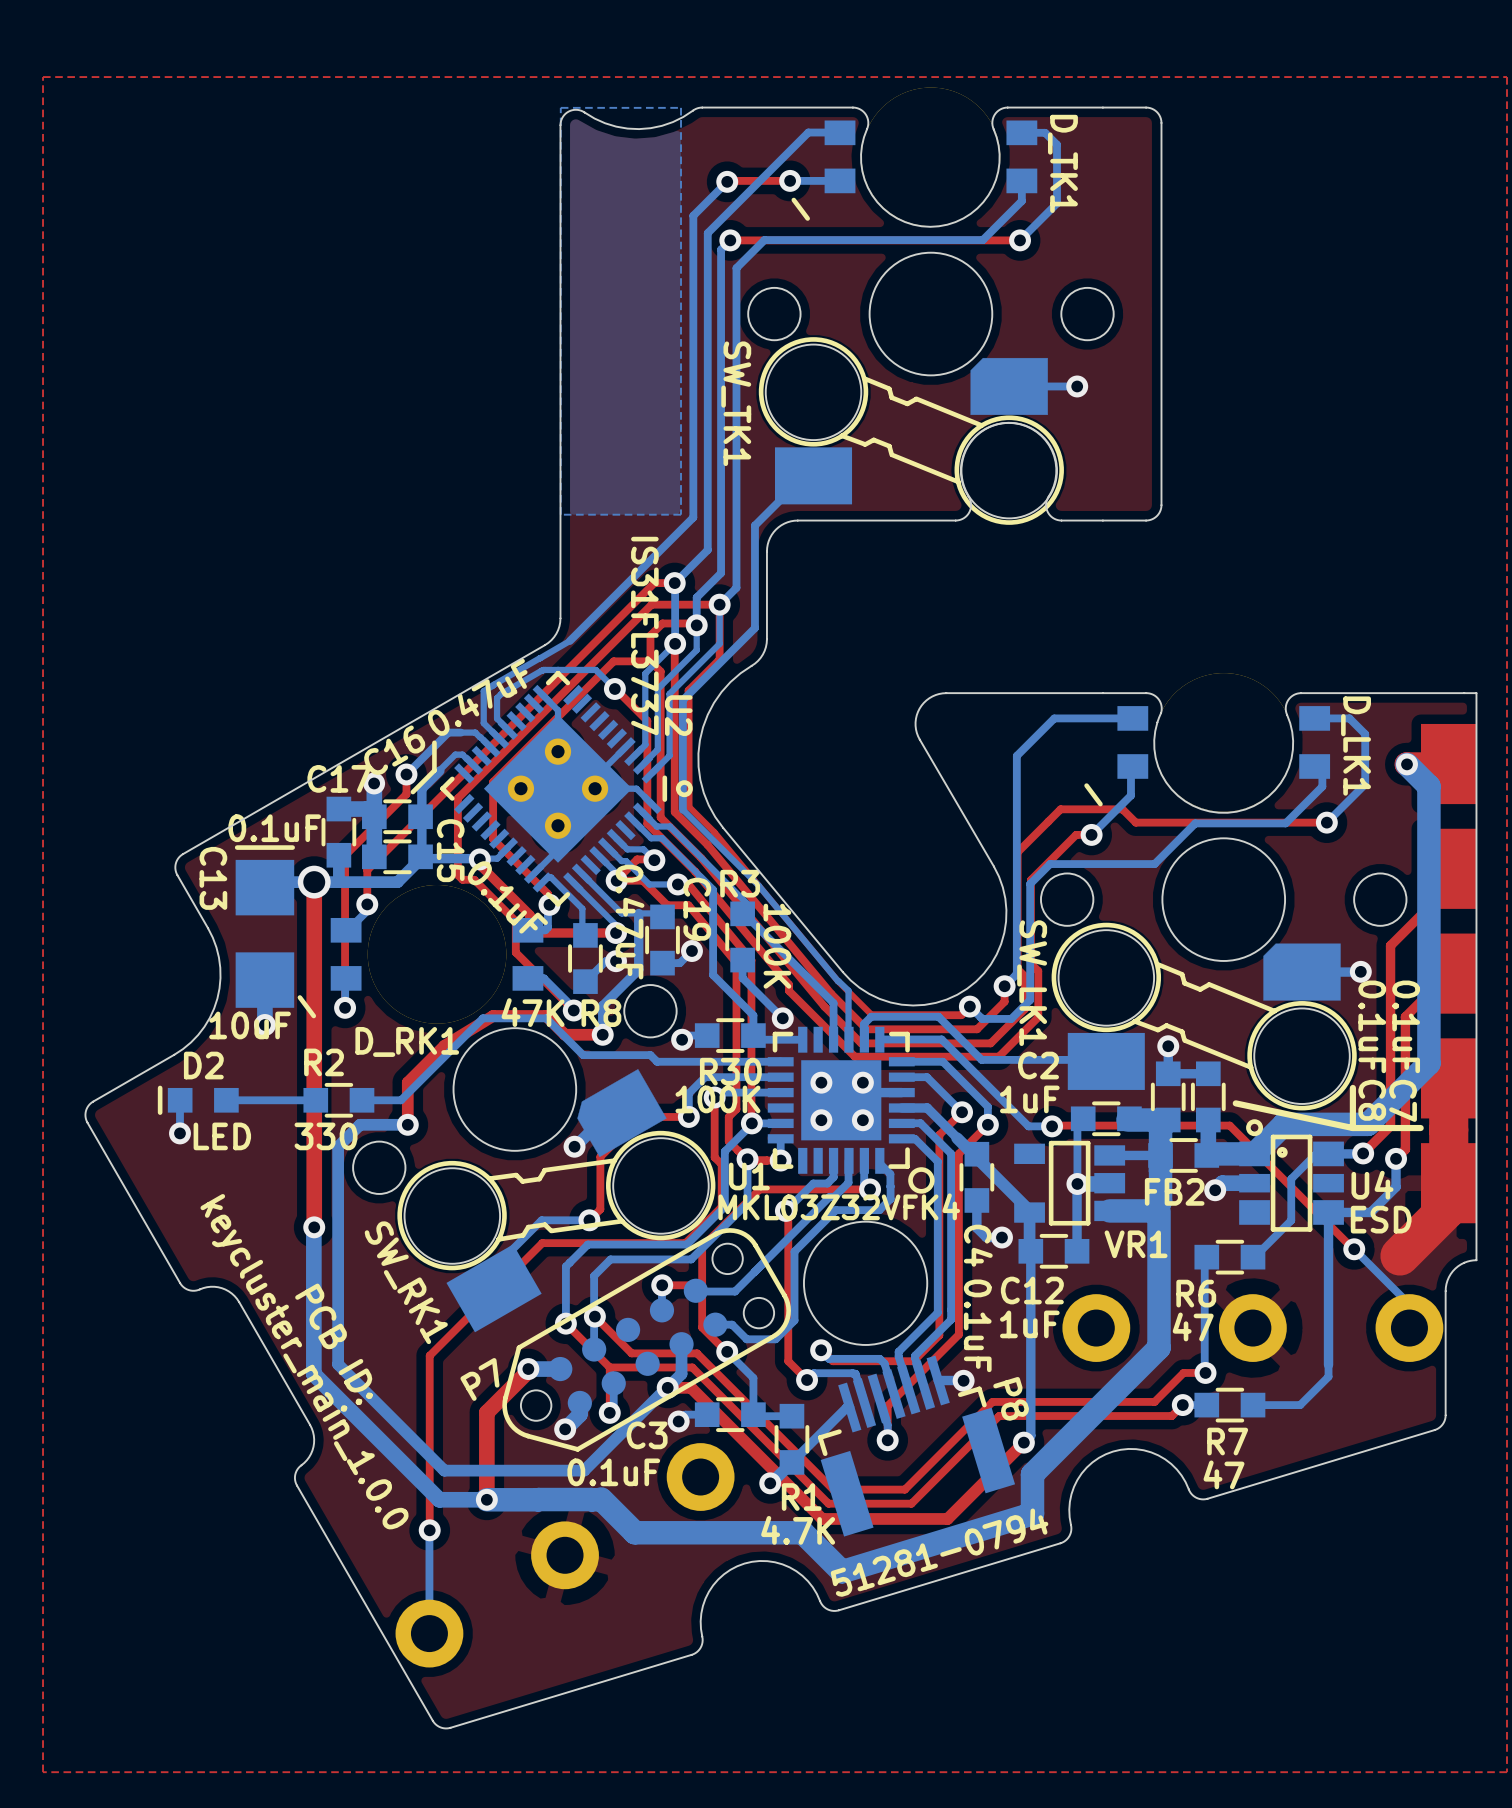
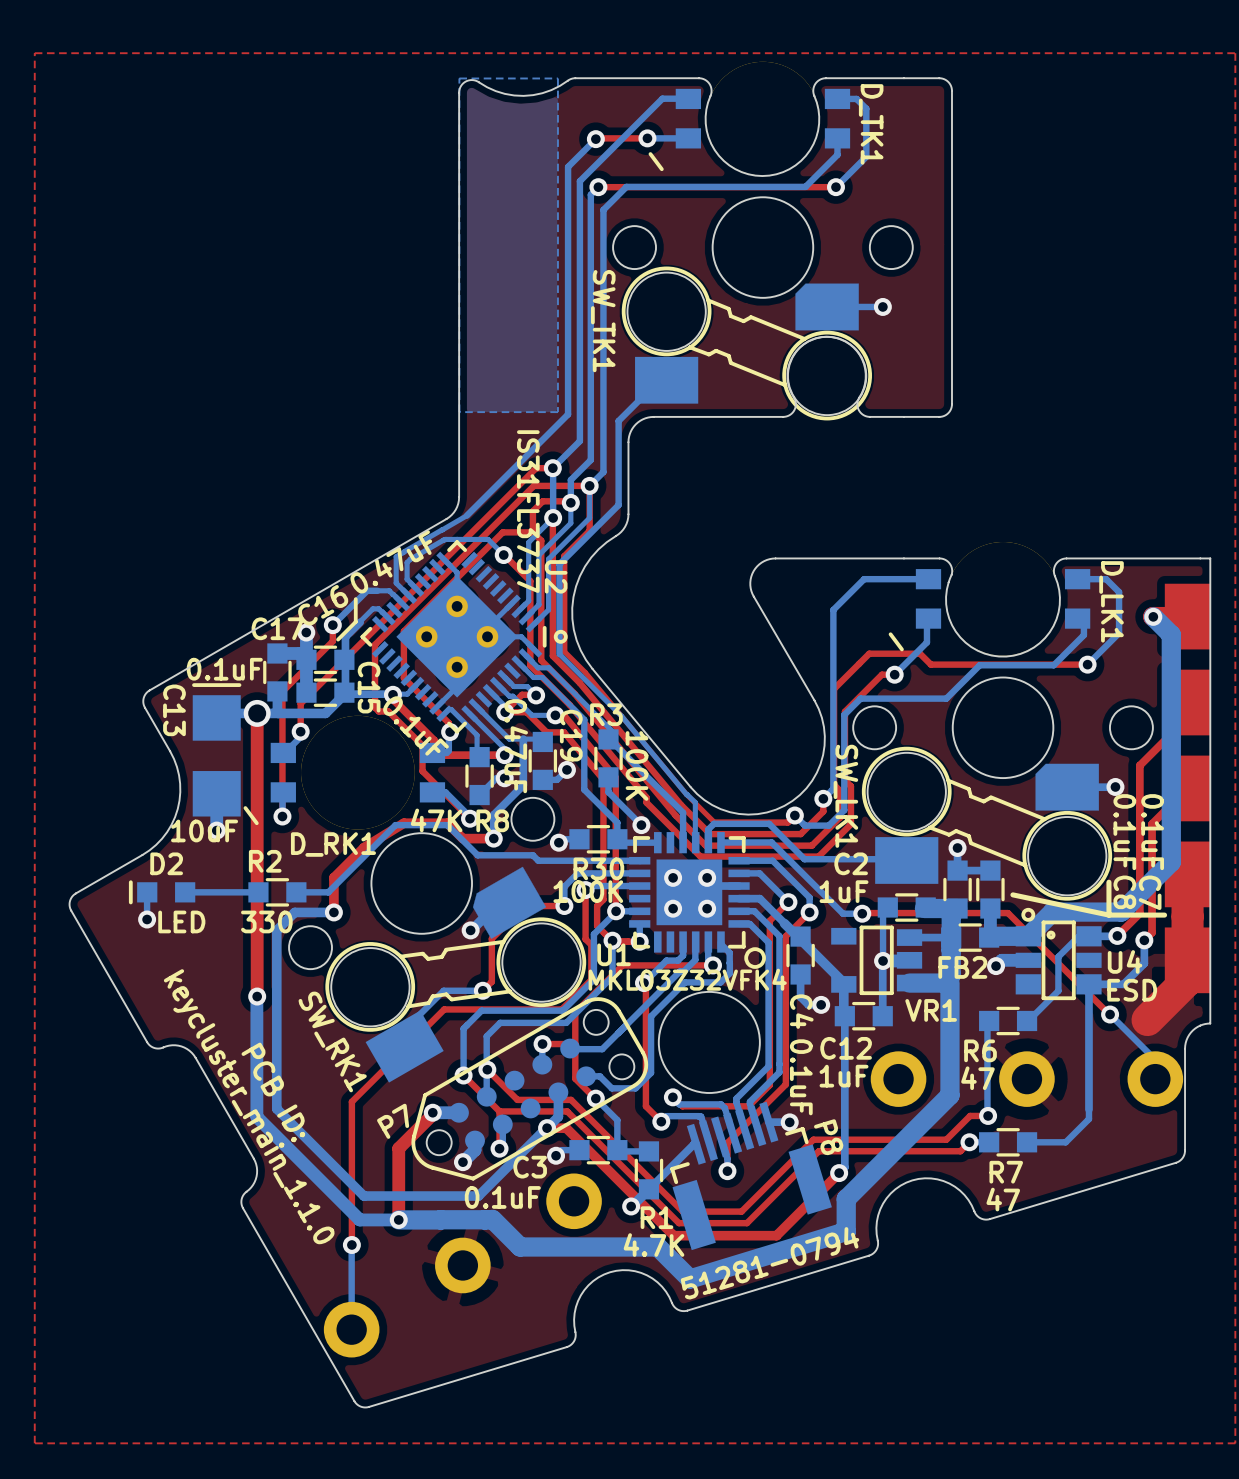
text: keycluster_main_1.0.0 (304, 1361) -> keycluster_main_1.1.0 (249, 1106)

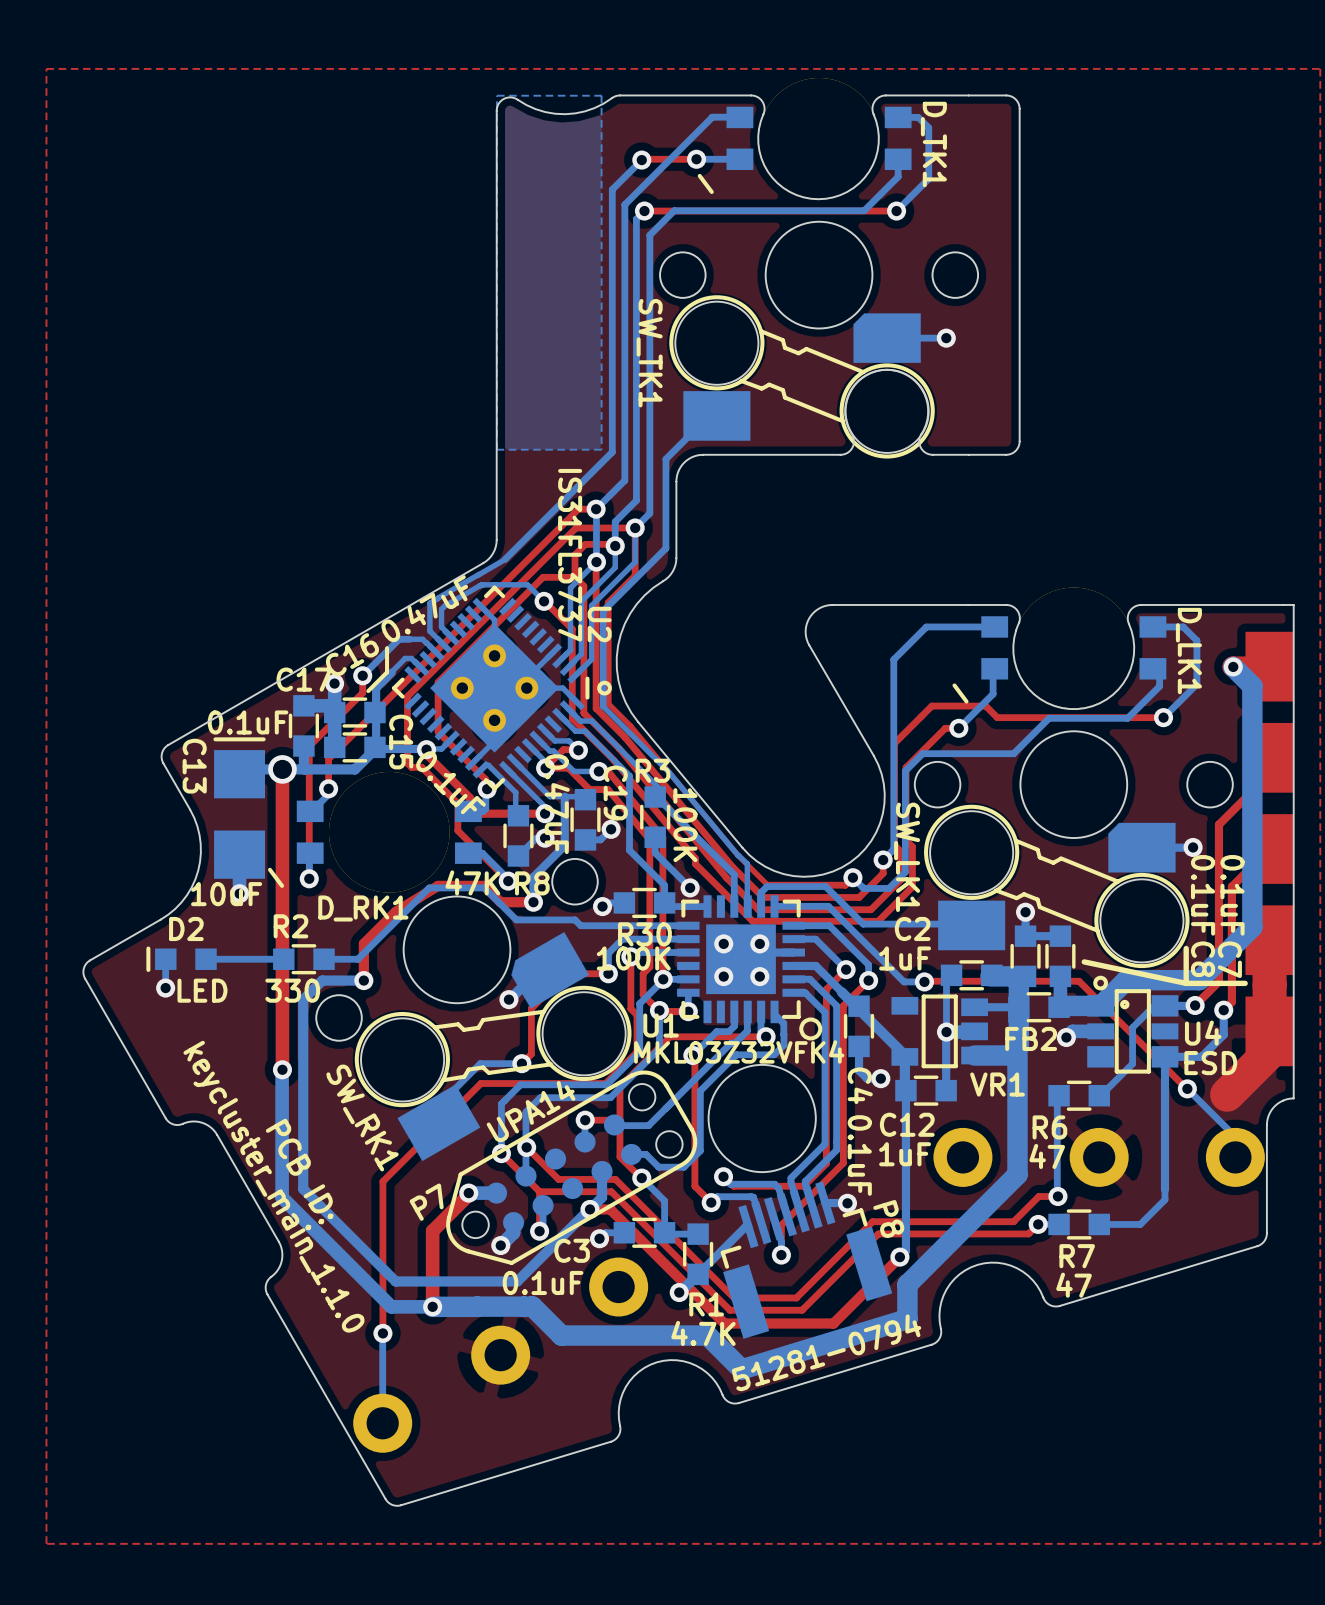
text: none -> UPA14 (531, 1111)

